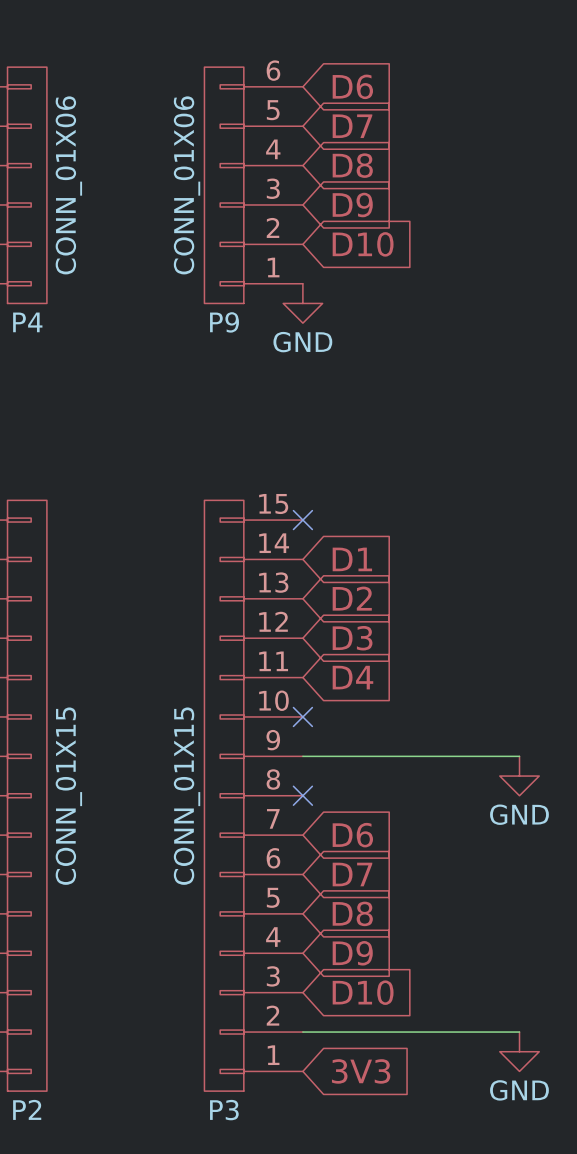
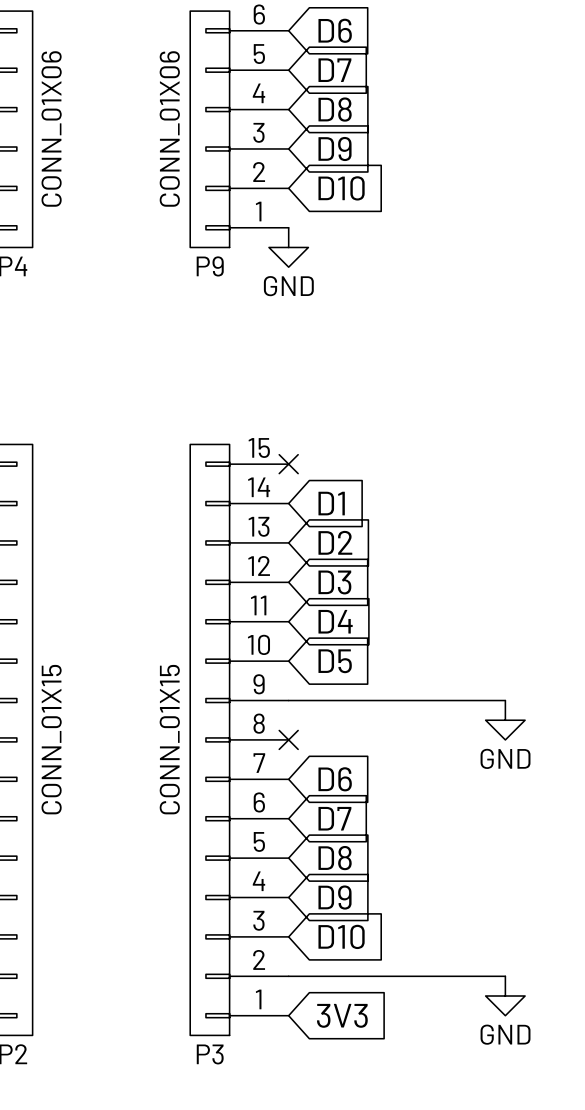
no-connect mark: (302, 716) -> none
global label: none -> D5 (335, 661)

